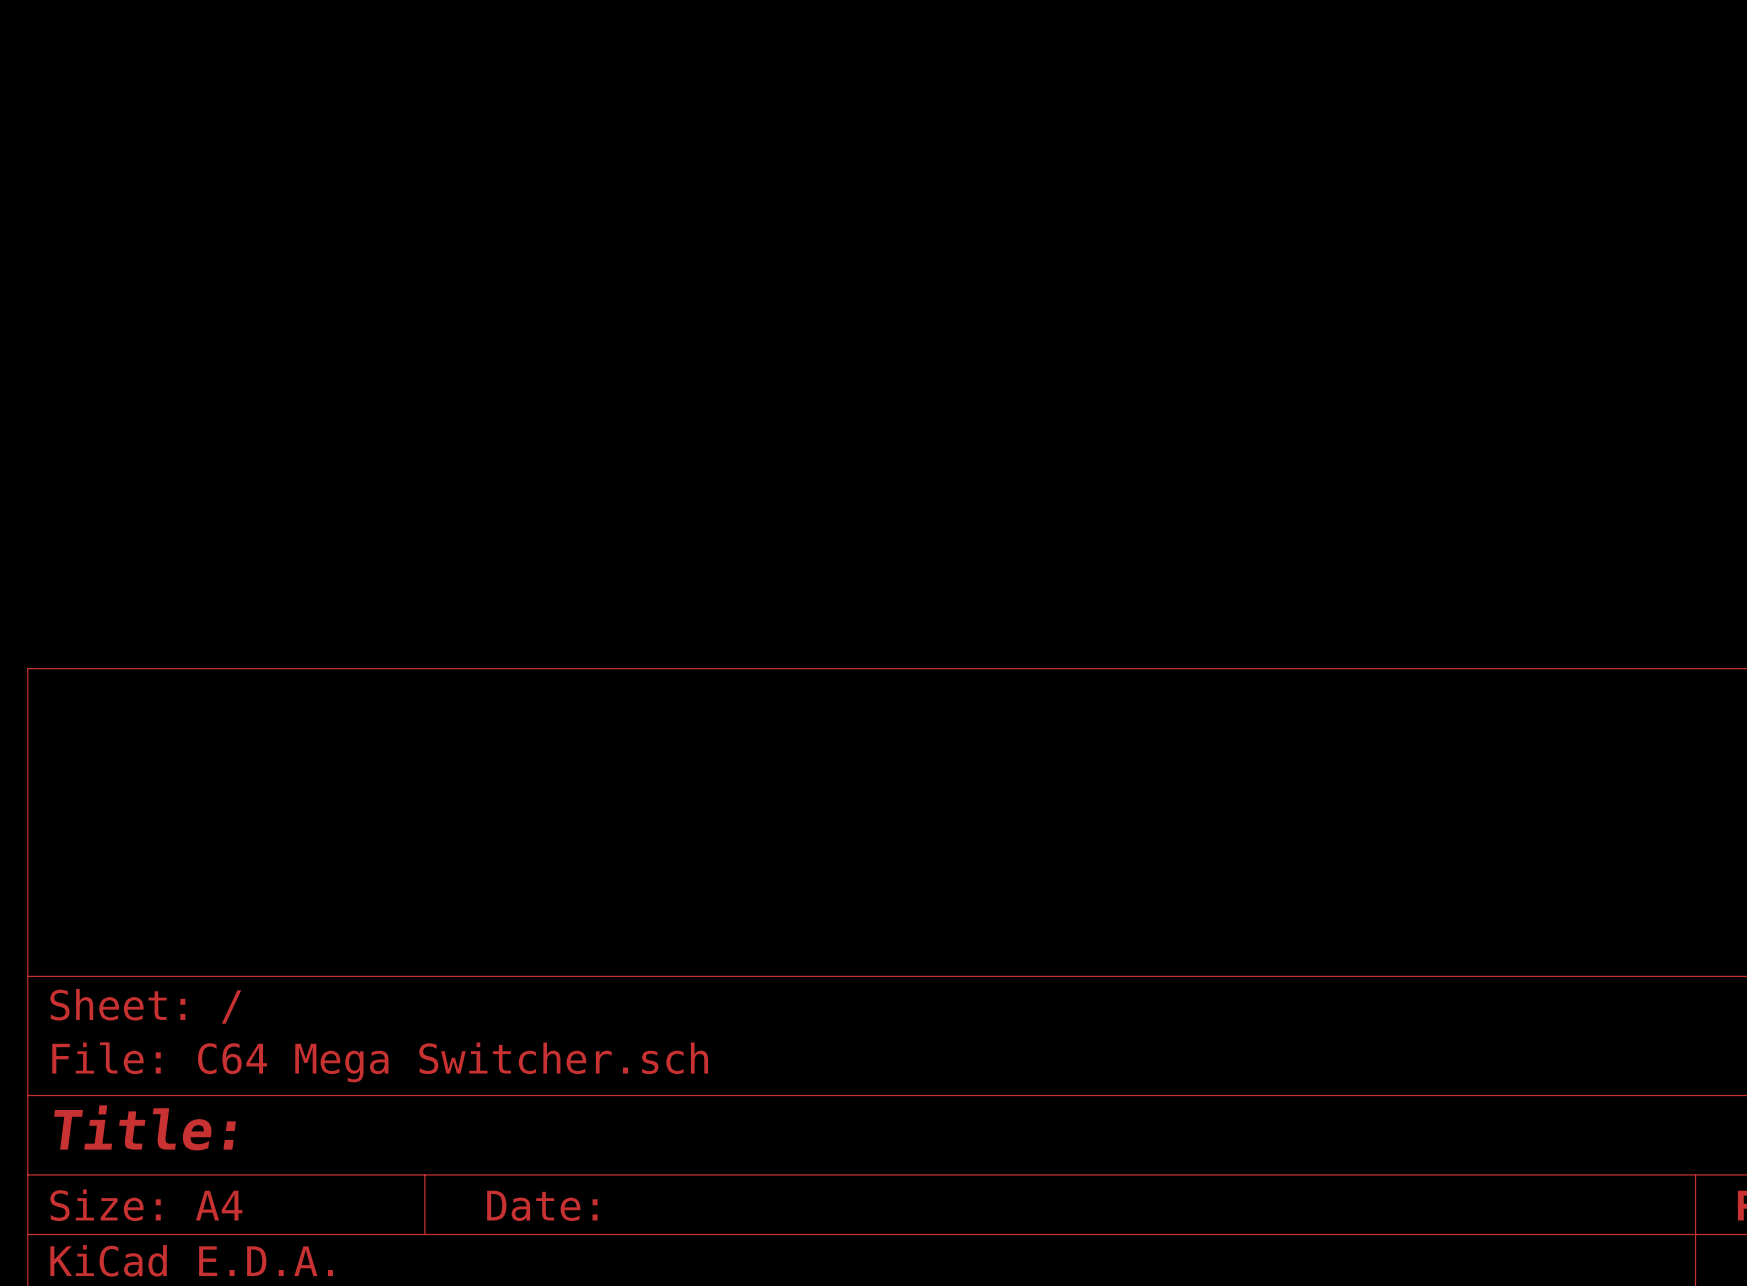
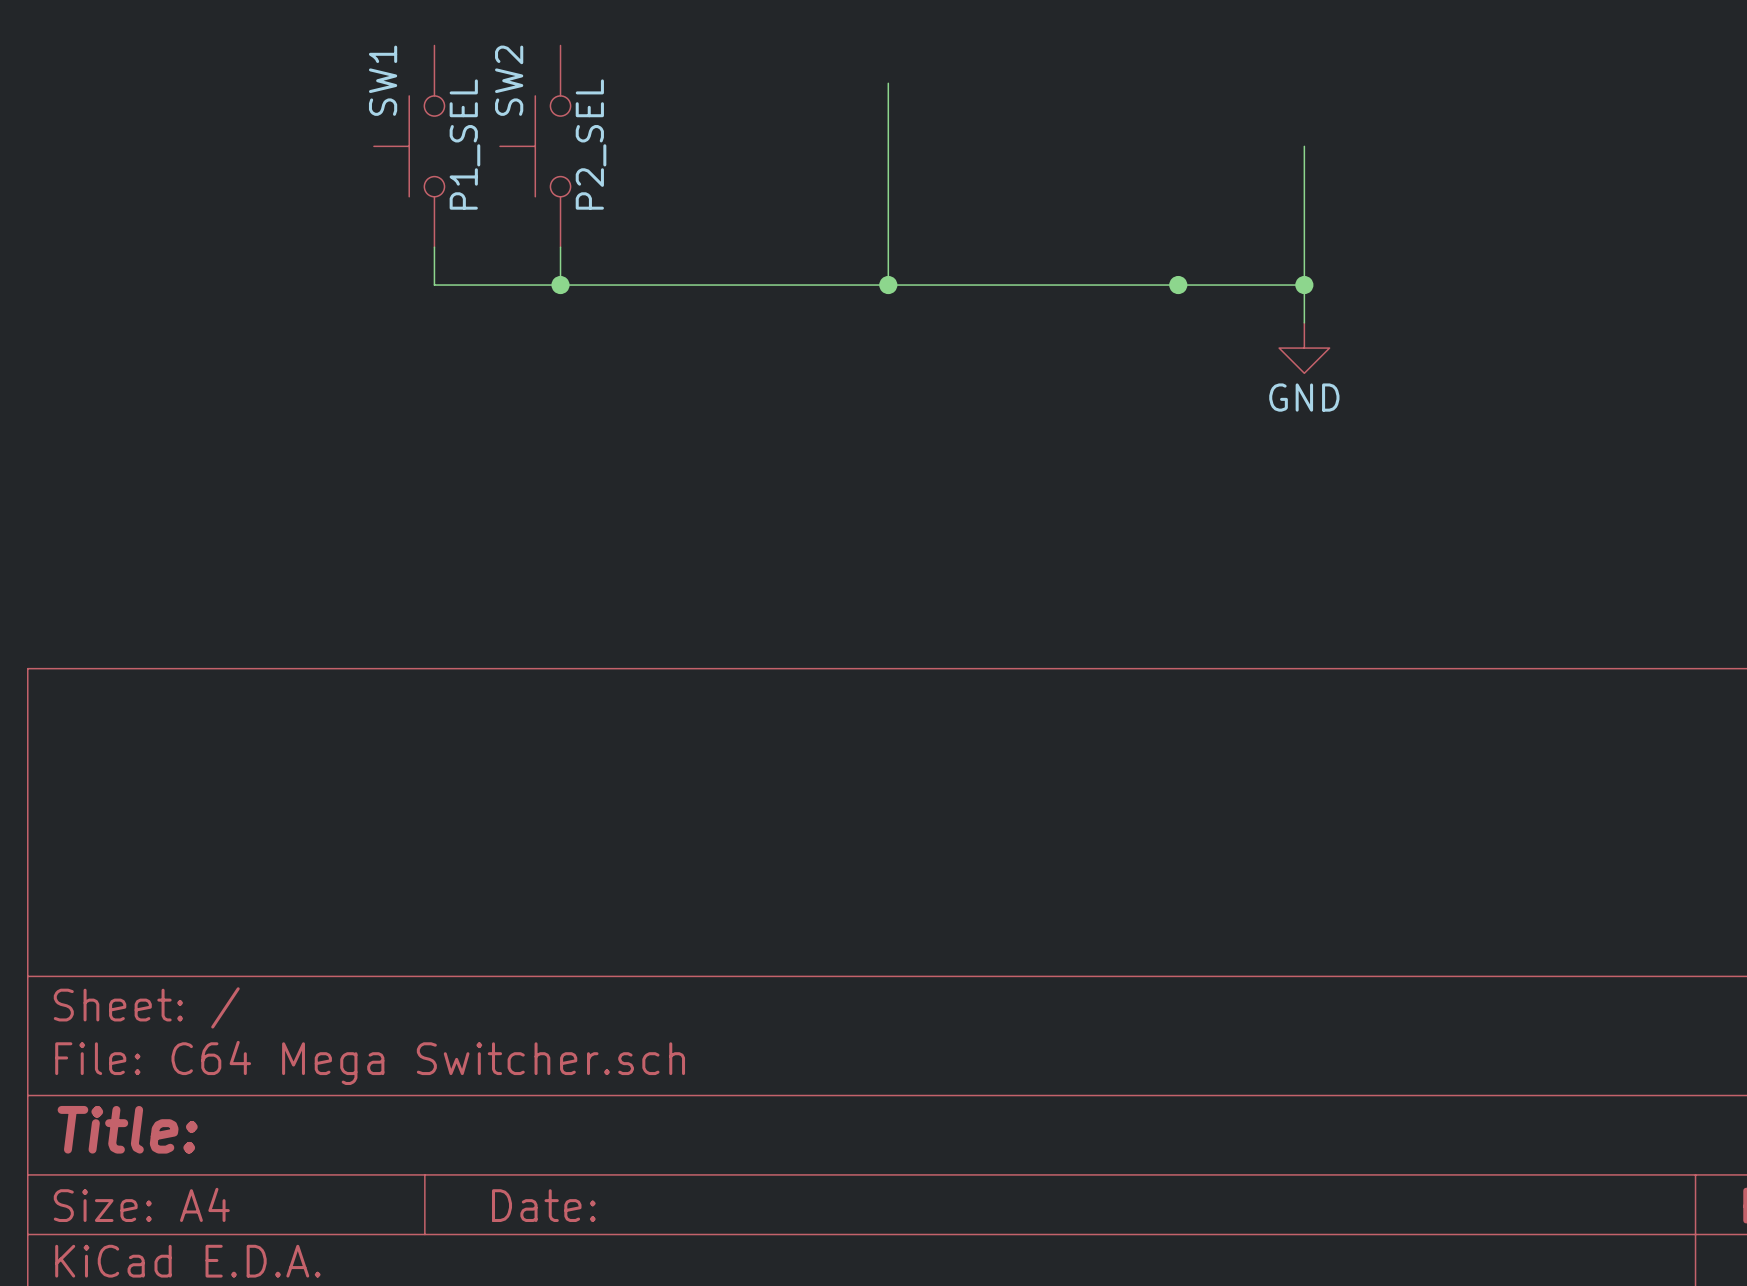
wire: none -> (888, 83) (888, 285)
SW1: none -> P1_SEL (409, 146)
SW2: none -> P2_SEL (535, 146)
wire: none -> (1304, 146) (1304, 322)
wire: none -> (434, 247) (434, 285) (1304, 285)
wire: none -> (560, 247) (560, 285)
junction: none -> (560, 285)
junction: none -> (888, 285)
junction: none -> (1178, 285)
junction: none -> (1304, 285)
power symbol: none -> GND (1304, 348)

